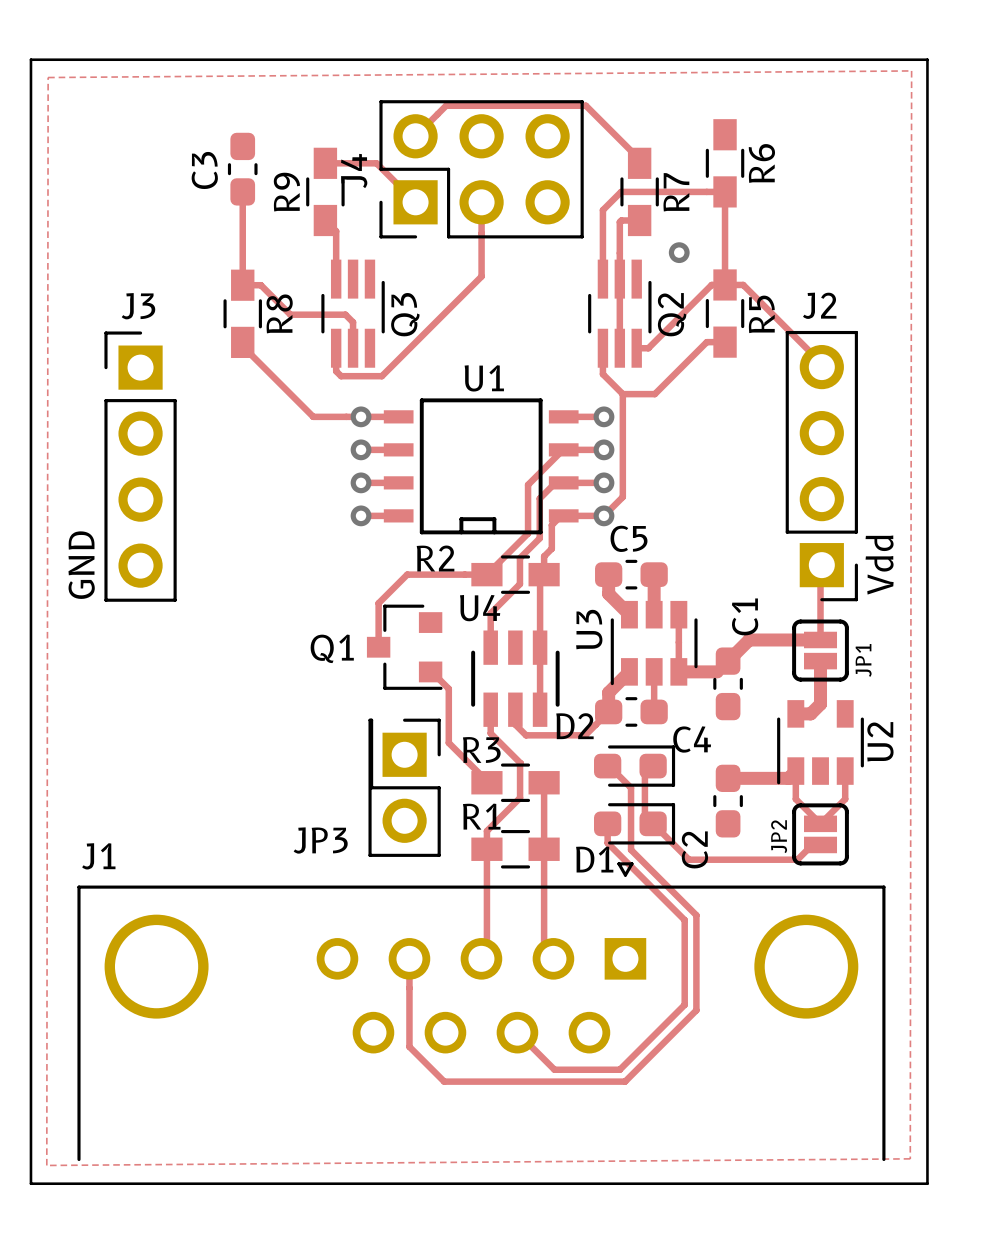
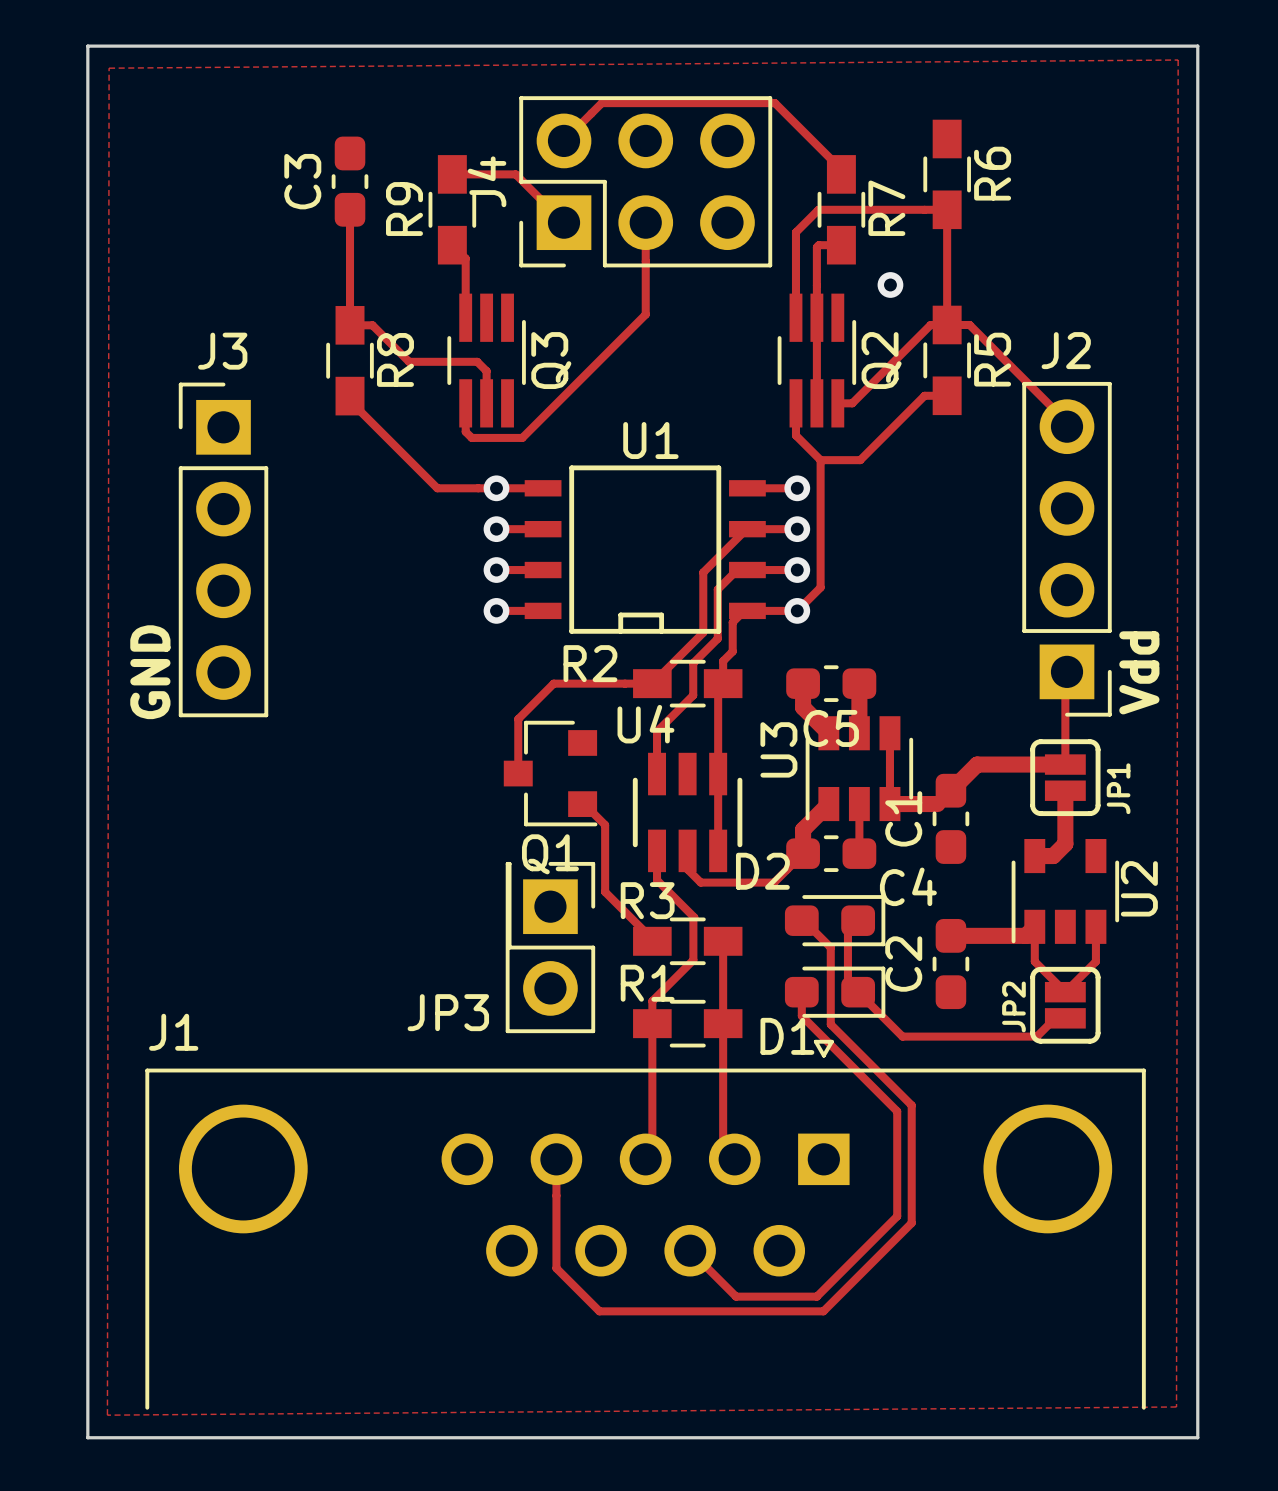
C5 name position: C5 (629, 538) -> C5 (831, 728)
C1 name position: C1 (745, 616) -> C1 (903, 818)
Q1 name position: Q1 (332, 648) -> Q1 (550, 854)
C2 name position: C2 (694, 849) -> C2 (903, 964)

